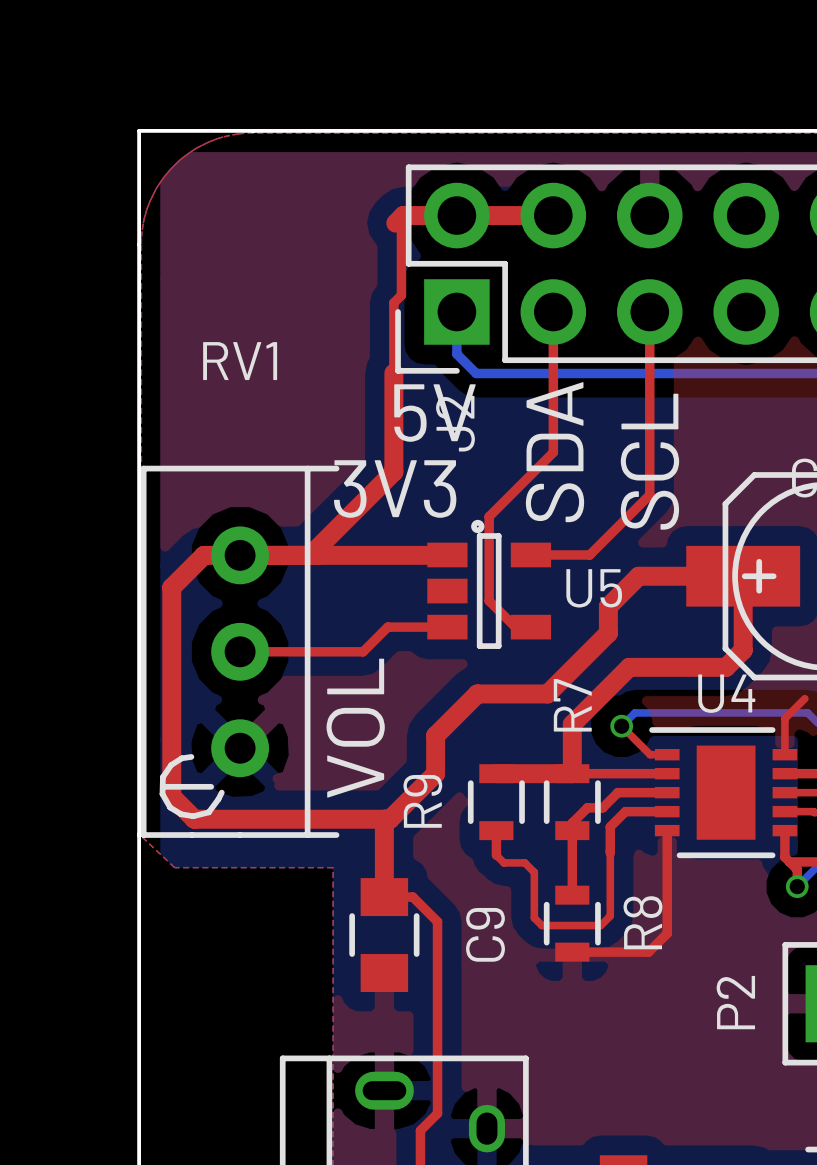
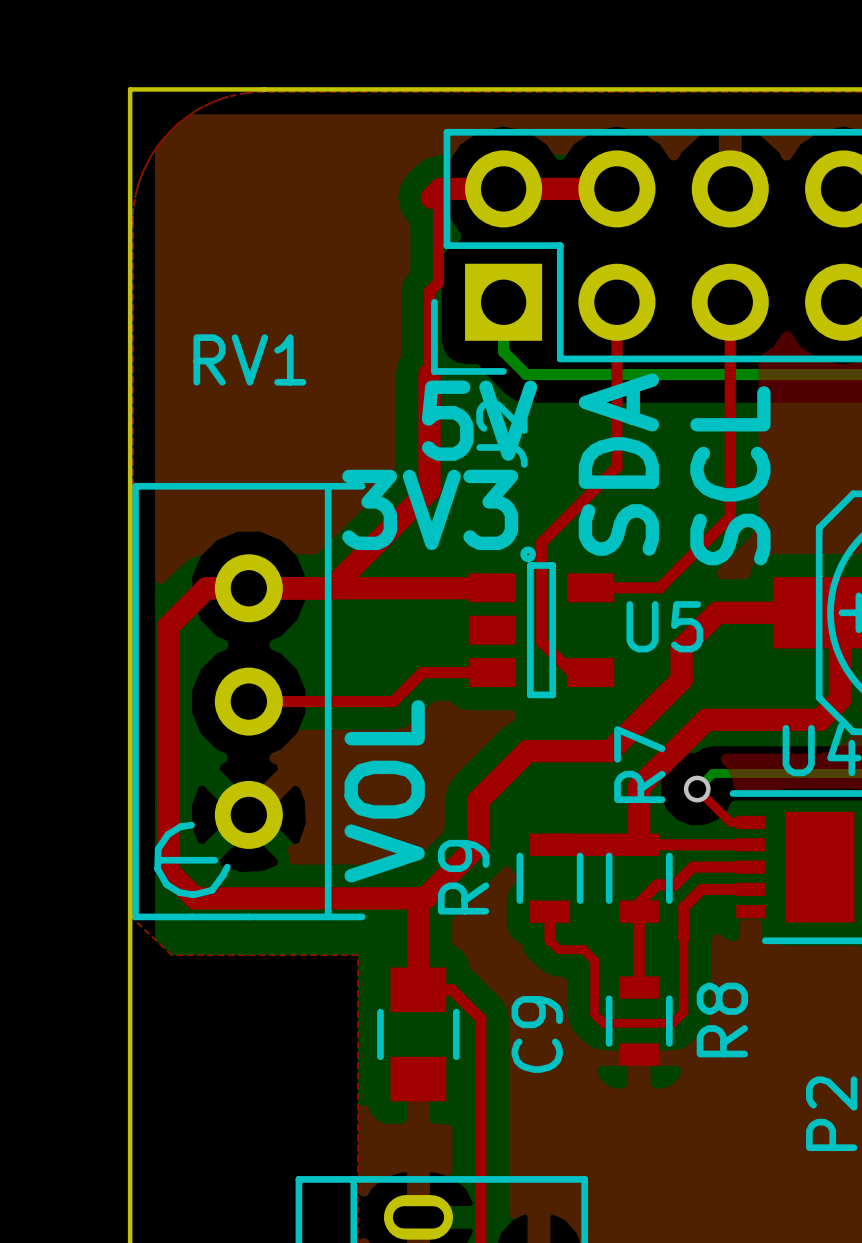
top track: (667, 830) (667, 933) (648, 952) (572, 952) -> none

